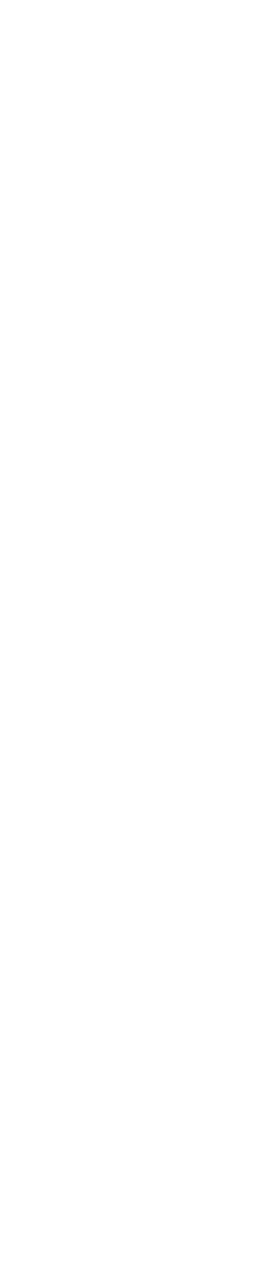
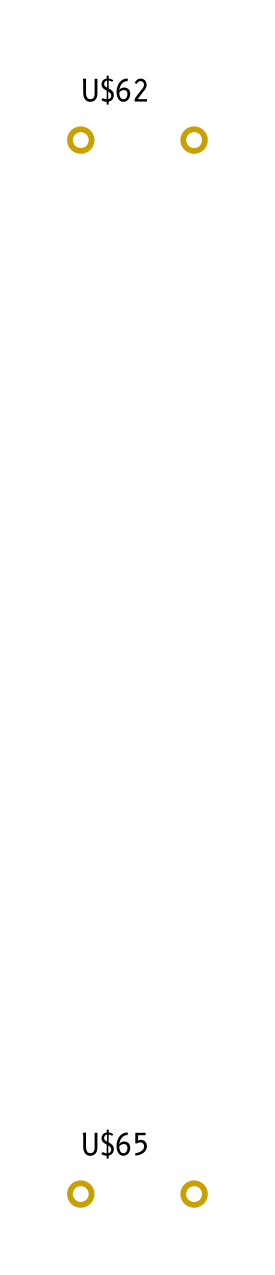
U$62: none -> (137, 140)
U$65: none -> (137, 1194)

